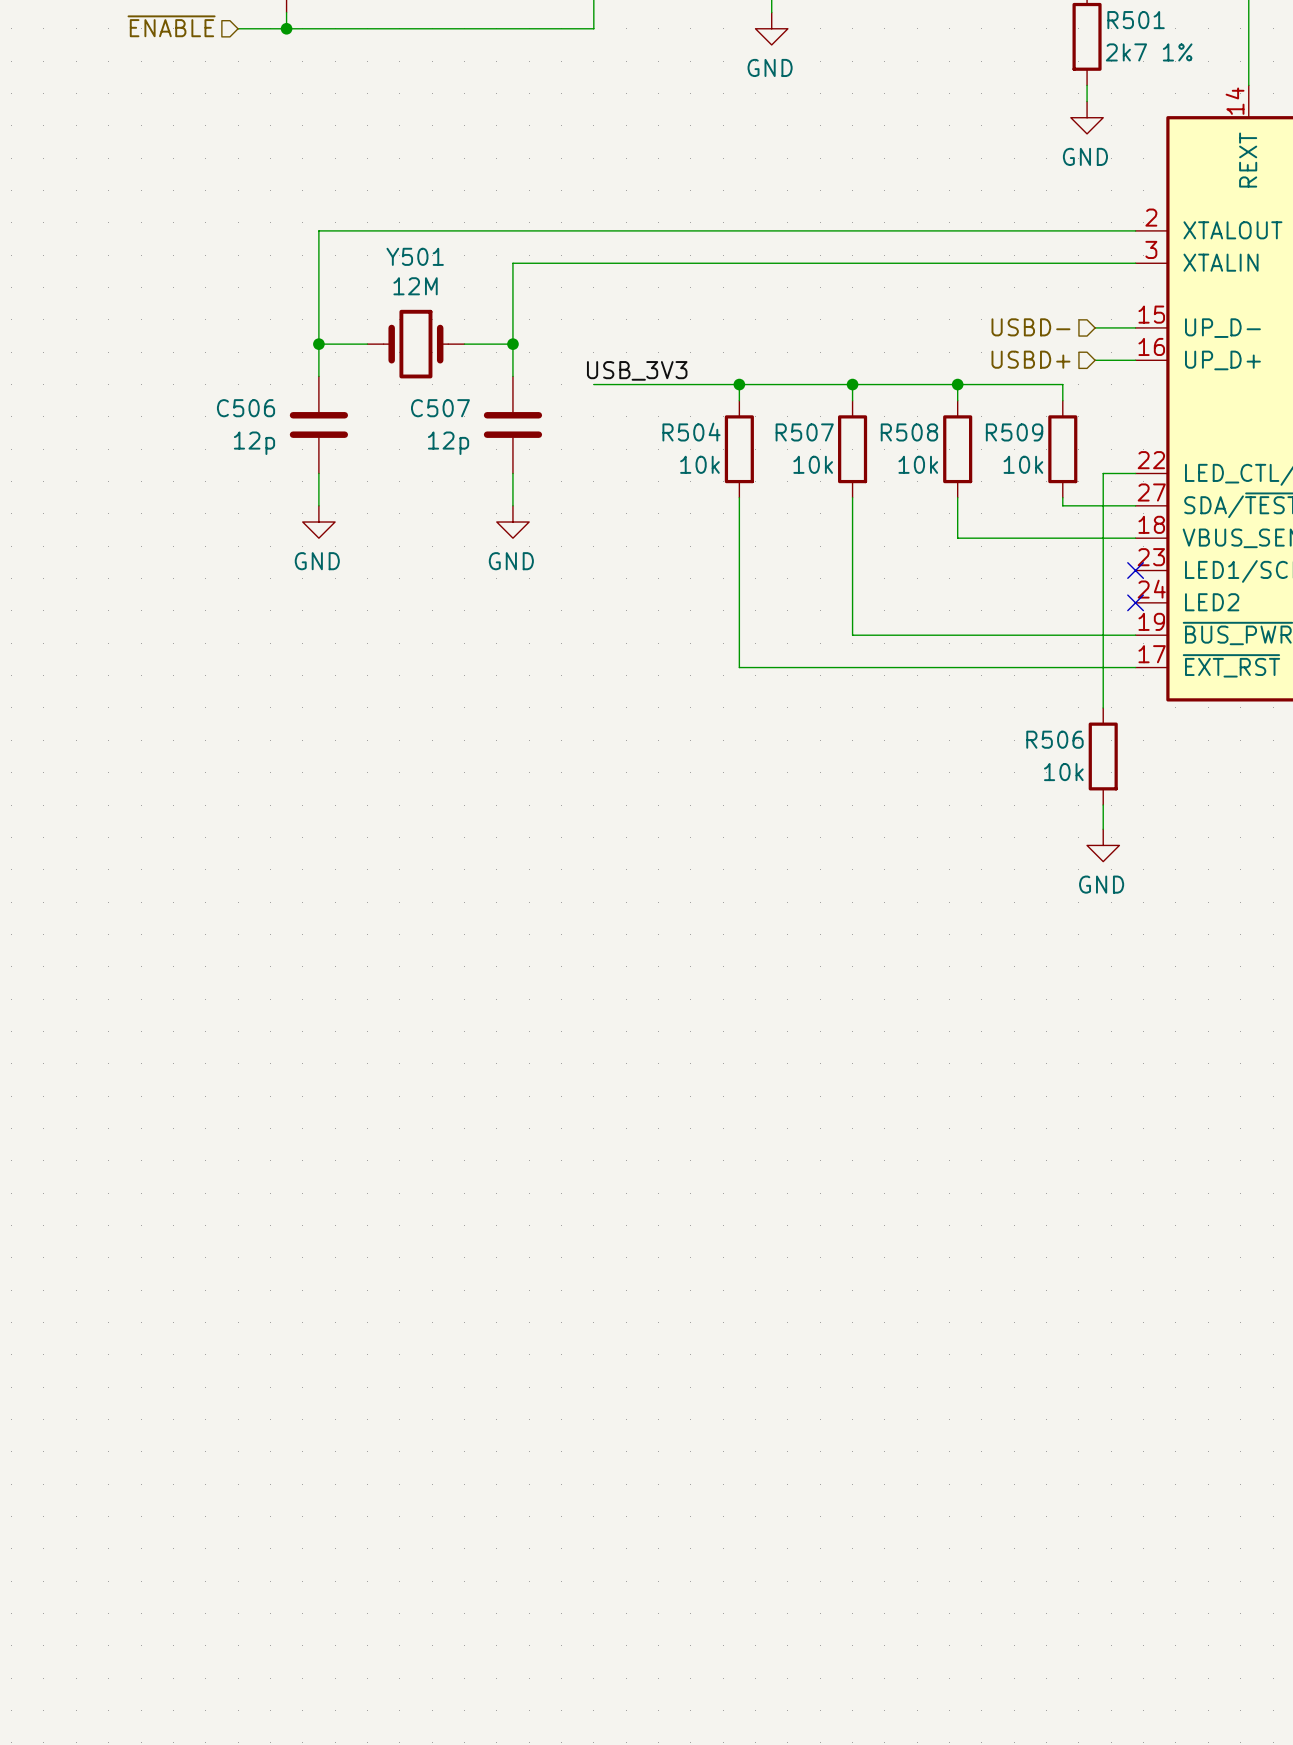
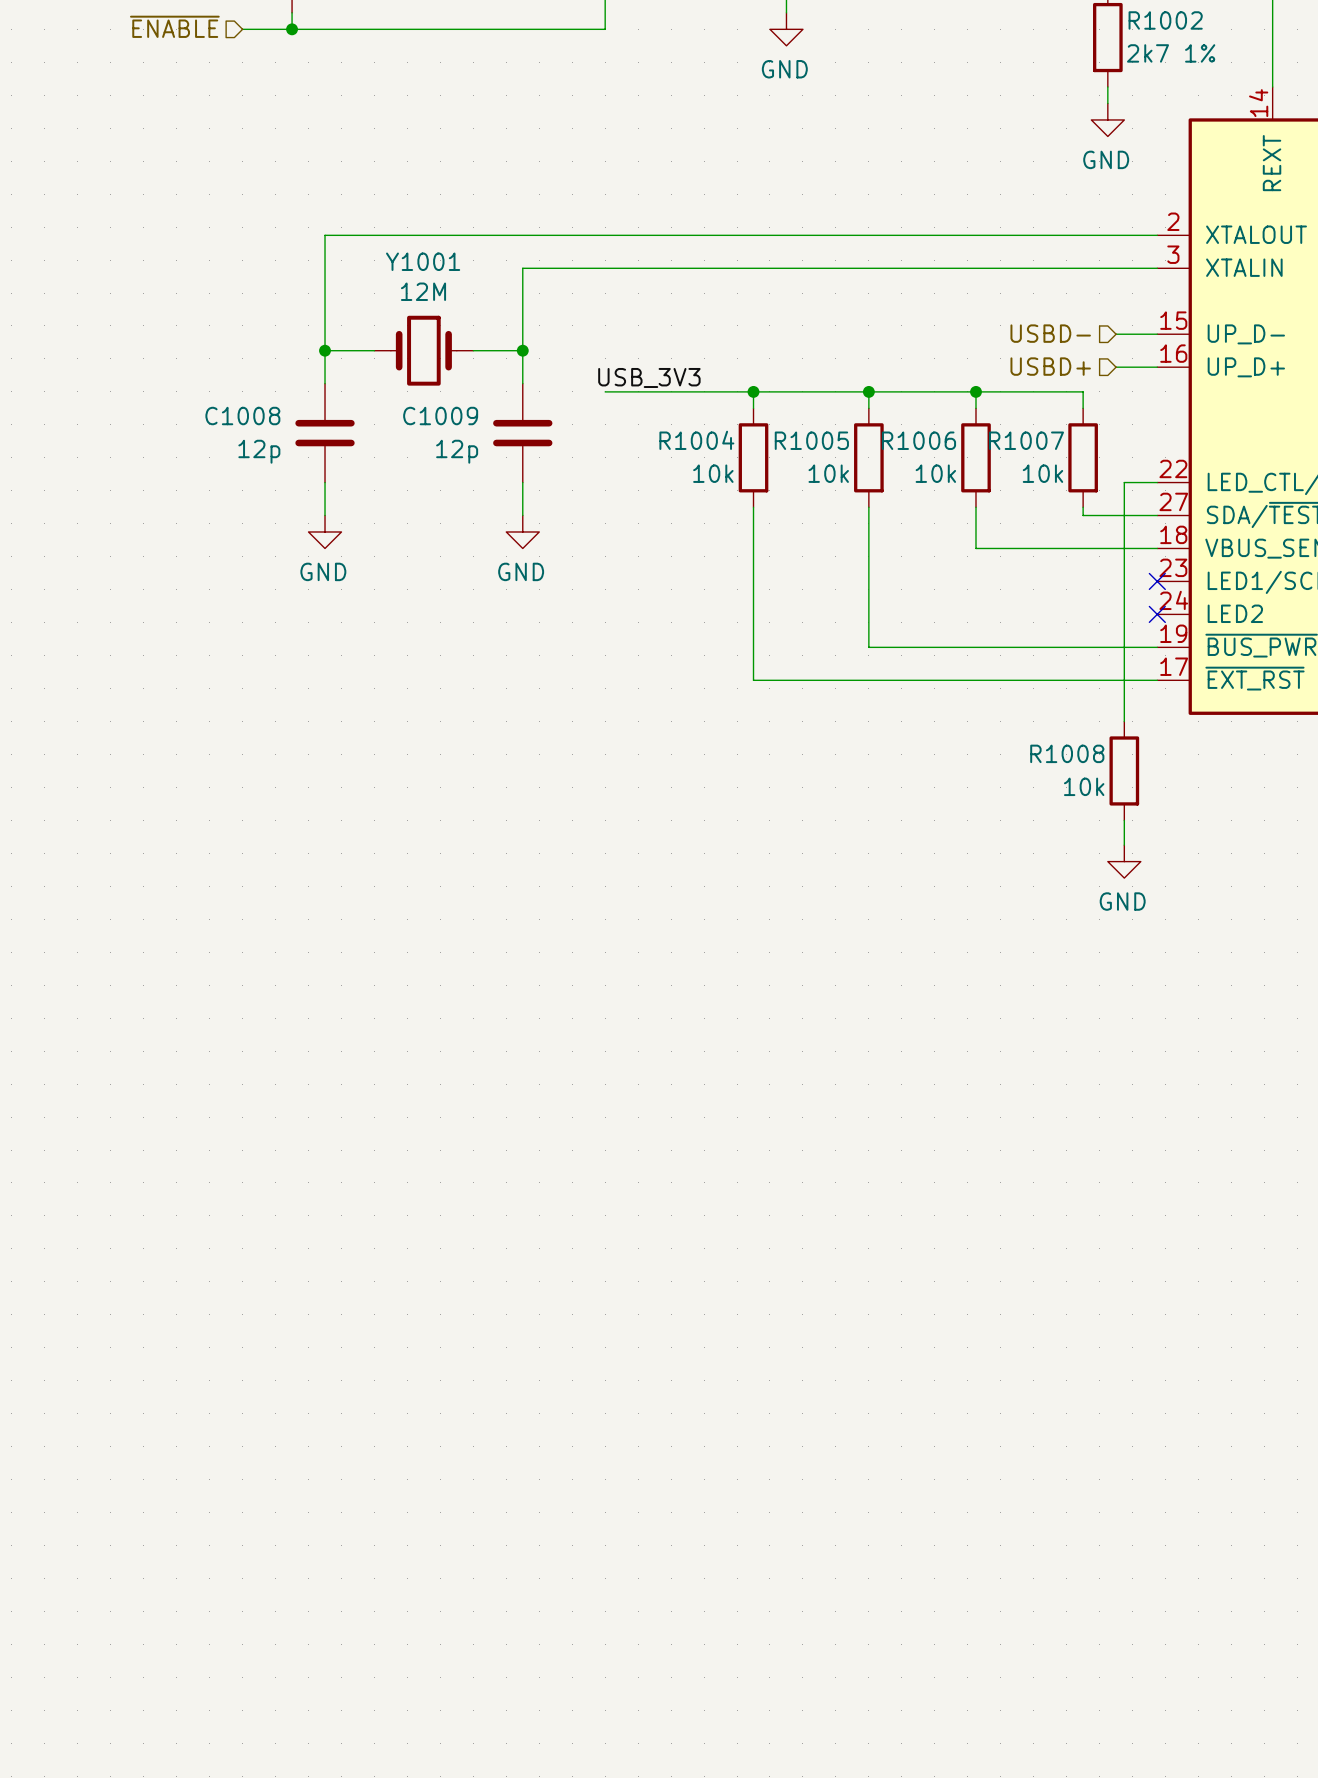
R501 name: R501 (1136, 20) -> R1002 (1165, 20)
Y501 name: Y501 (415, 256) -> Y1001 (423, 261)
C506 name: C506 (246, 408) -> C1008 (242, 416)
C507 name: C507 (440, 408) -> C1009 (440, 416)
R504 name: R504 (691, 432) -> R1004 (696, 440)
R507 name: R507 (804, 432) -> R1005 (811, 440)
R508 name: R508 (909, 432) -> R1006 (918, 440)
R509 name: R509 (1014, 432) -> R1007 (1026, 440)
R506 name: R506 (1054, 739) -> R1008 (1067, 753)

